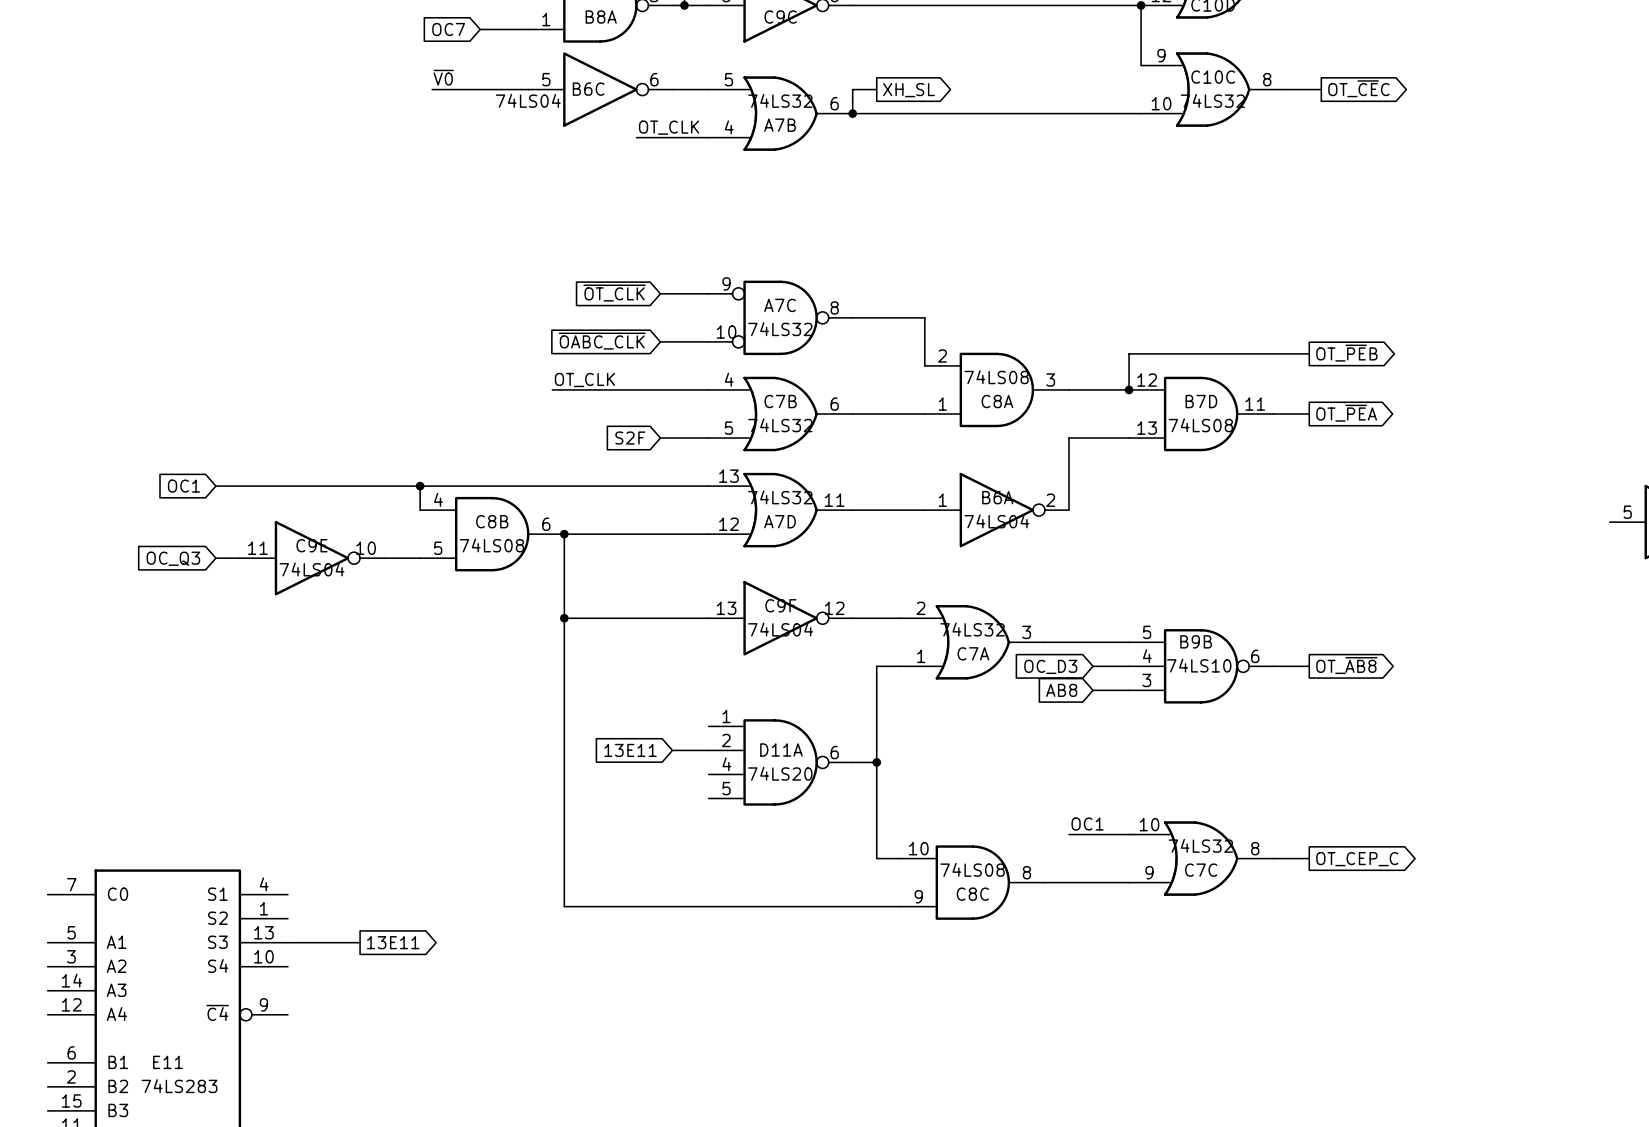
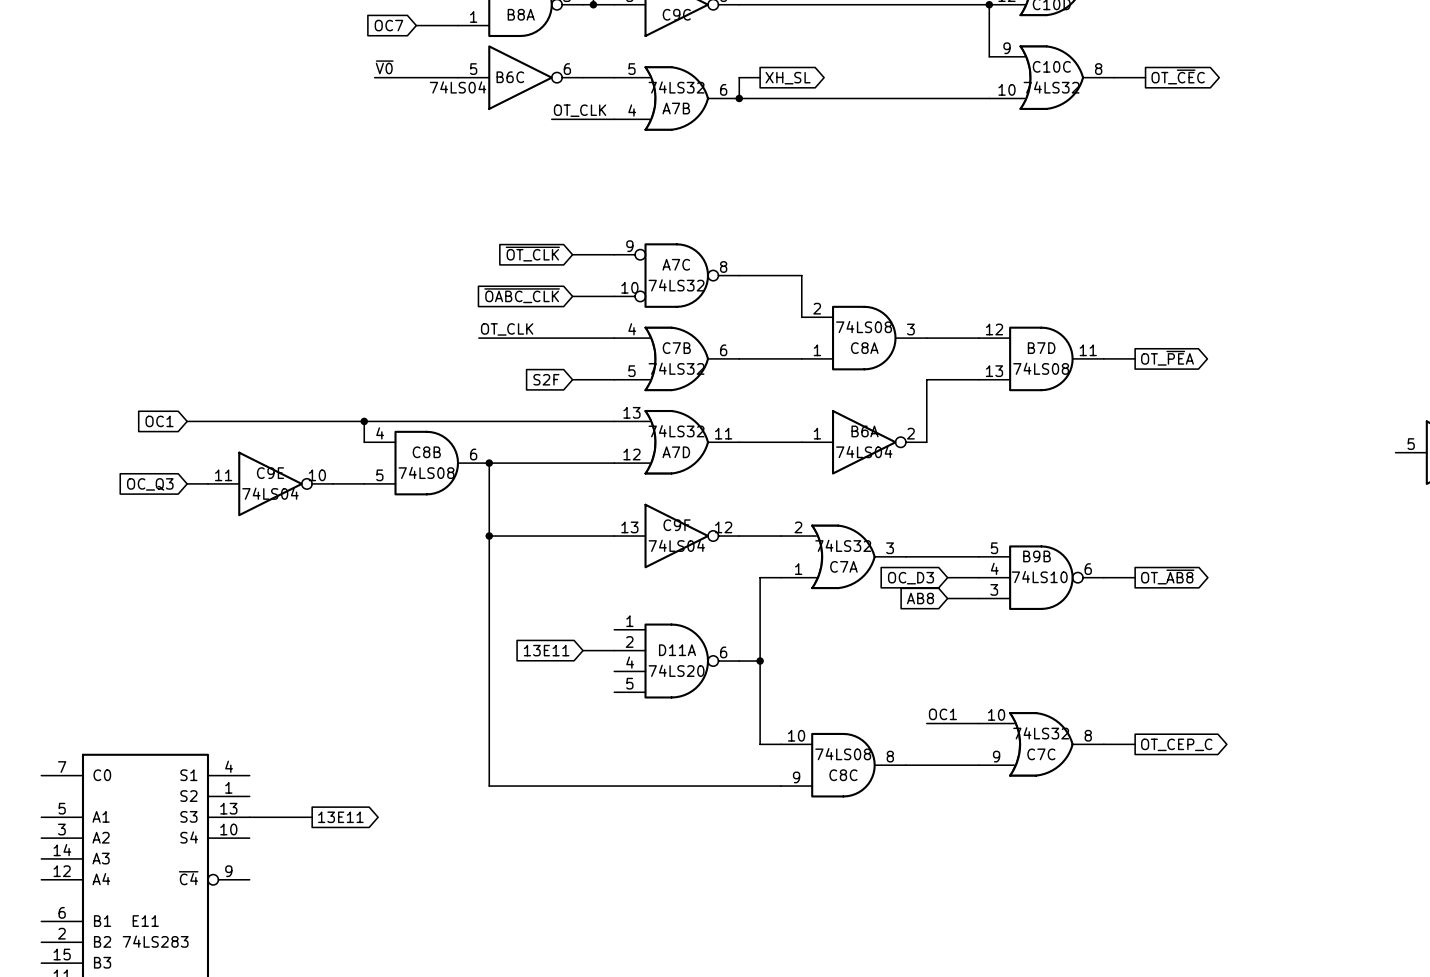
wire: (1309, 353) (1129, 353) (1129, 389) -> none
global label: OT_~{PE}B (1346, 353) -> none
junction: (1129, 389) -> none

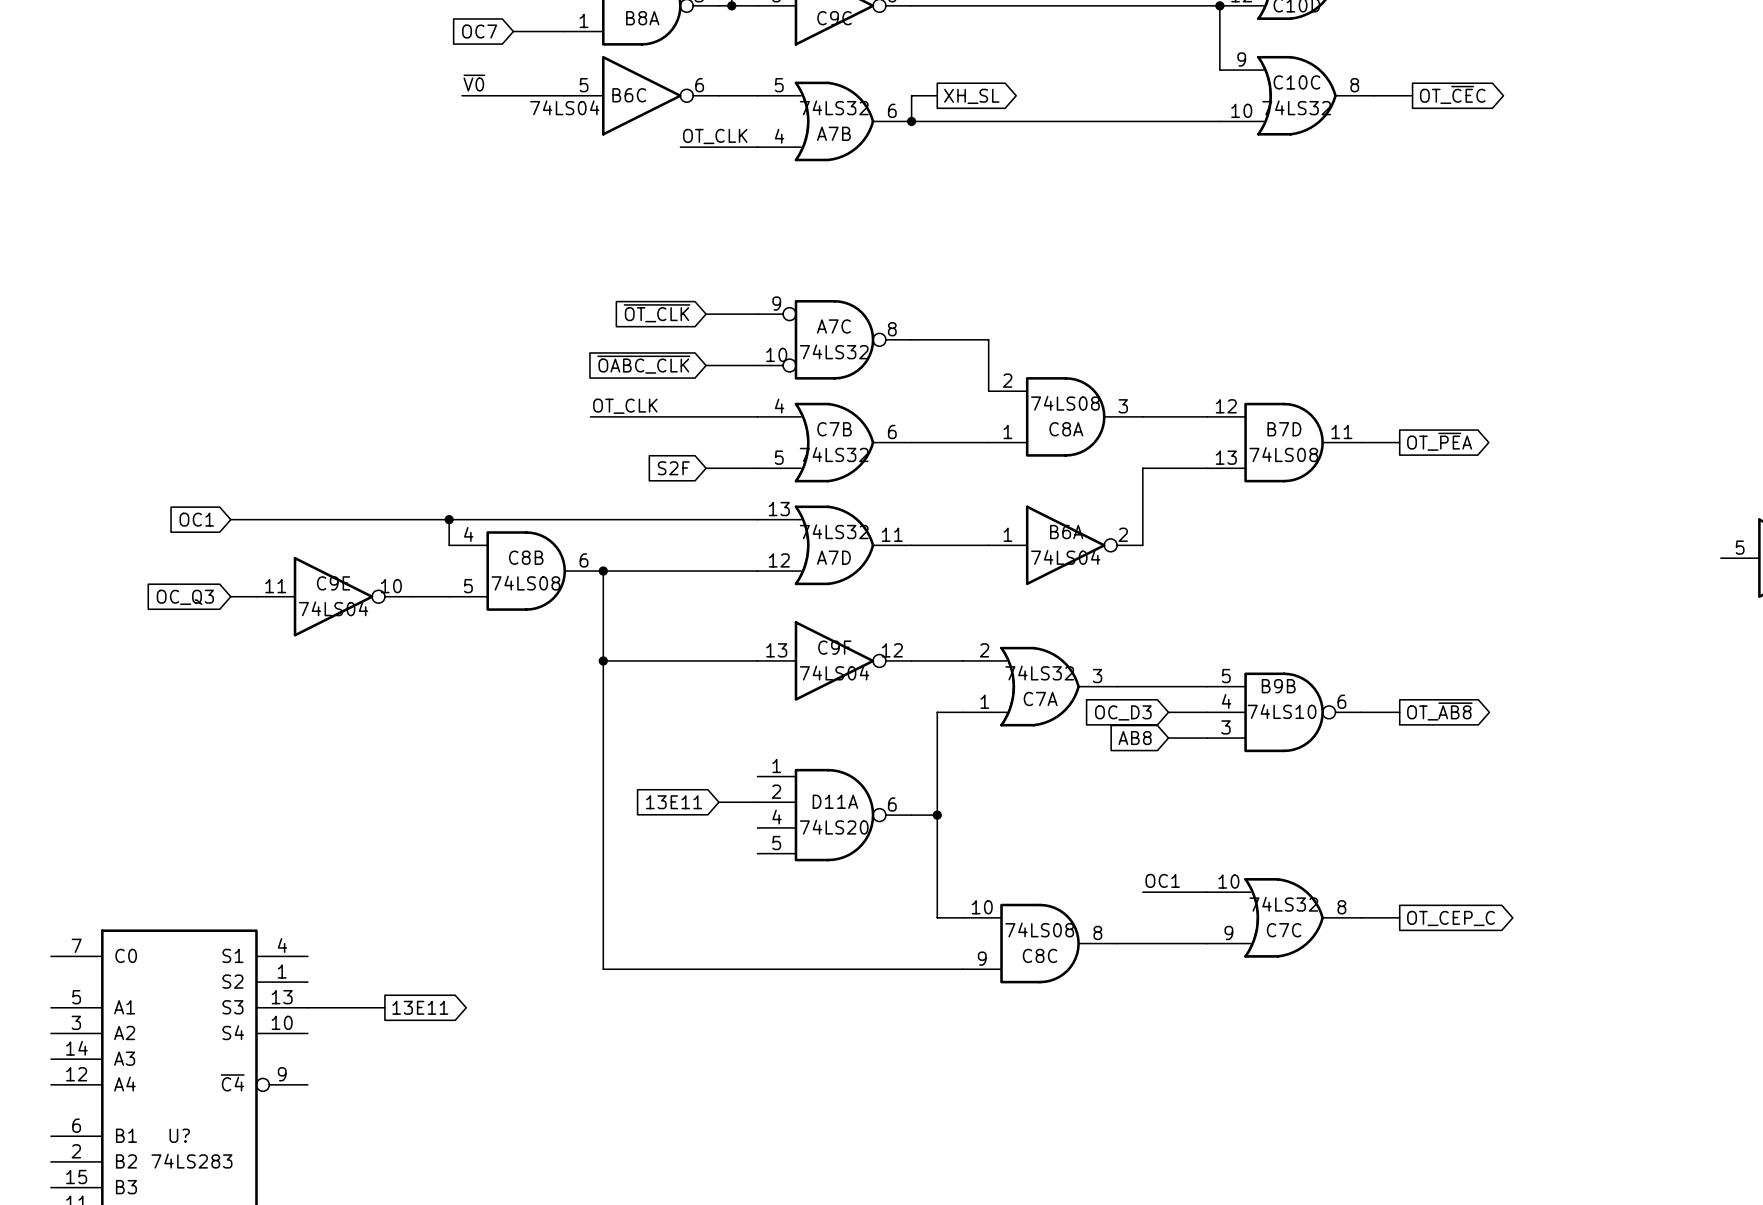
E11 name: E11 (145, 921) -> U? (179, 1135)

